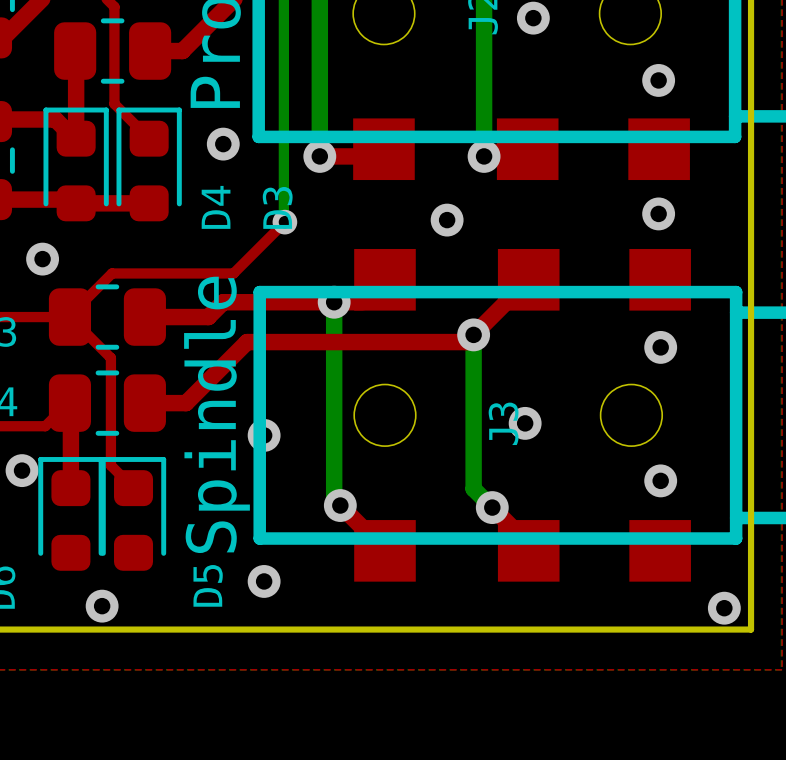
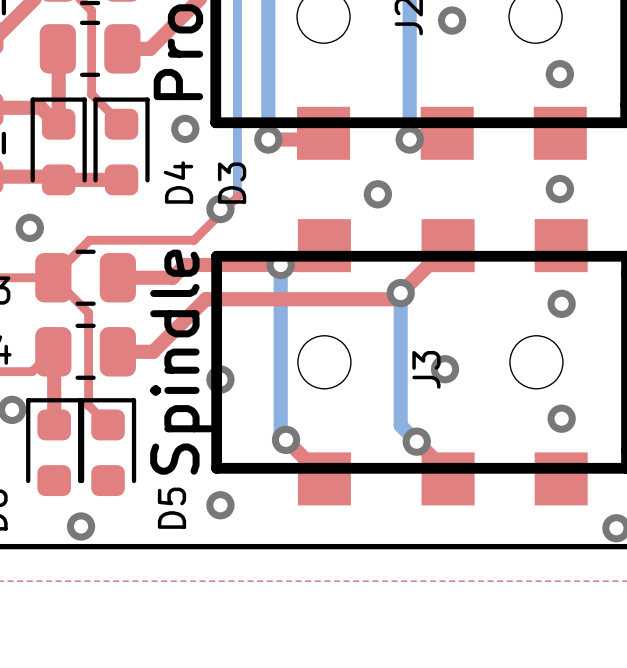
via position: (284, 222) -> (220, 209)

